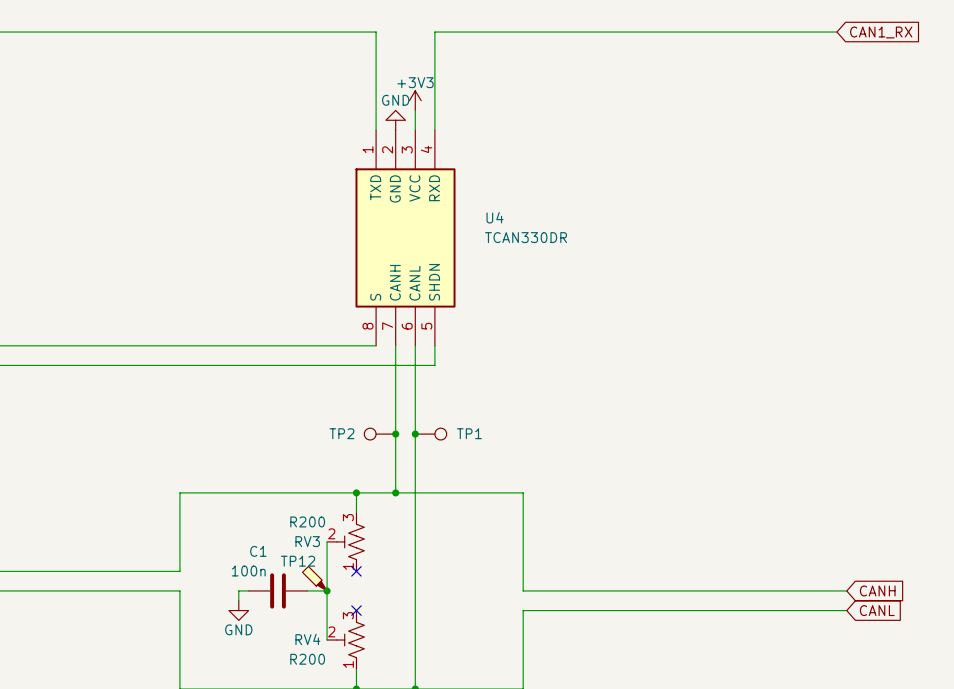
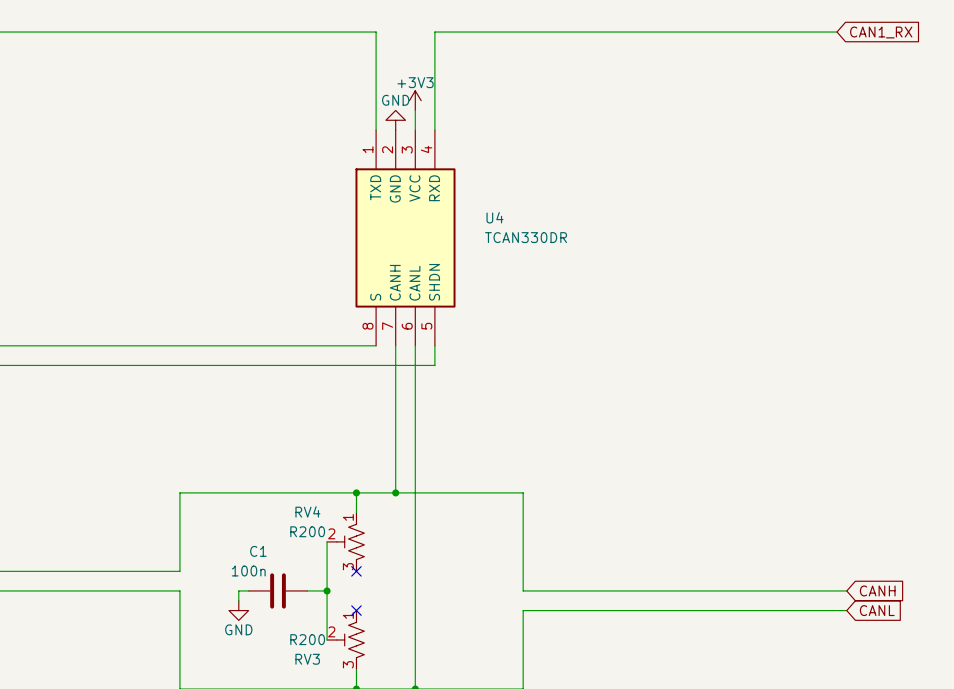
TP2: (380, 434) -> none
junction: (395, 434) -> none
junction: (415, 434) -> none
TP1: (430, 434) -> none
RV3 value position: R200 (307, 521) -> R200 (307, 639)
RV3 name position: RV3 (307, 541) -> RV3 (307, 659)
RV3 position: (345, 541) -> (345, 640)
RV3 flip: as is (350, 541) -> up-down (350, 640)
TP12: (314, 578) -> none
RV4 name position: RV4 (307, 639) -> RV4 (307, 511)
RV4 position: (345, 640) -> (345, 541)
RV4 flip: as is (350, 640) -> up-down (350, 541)

